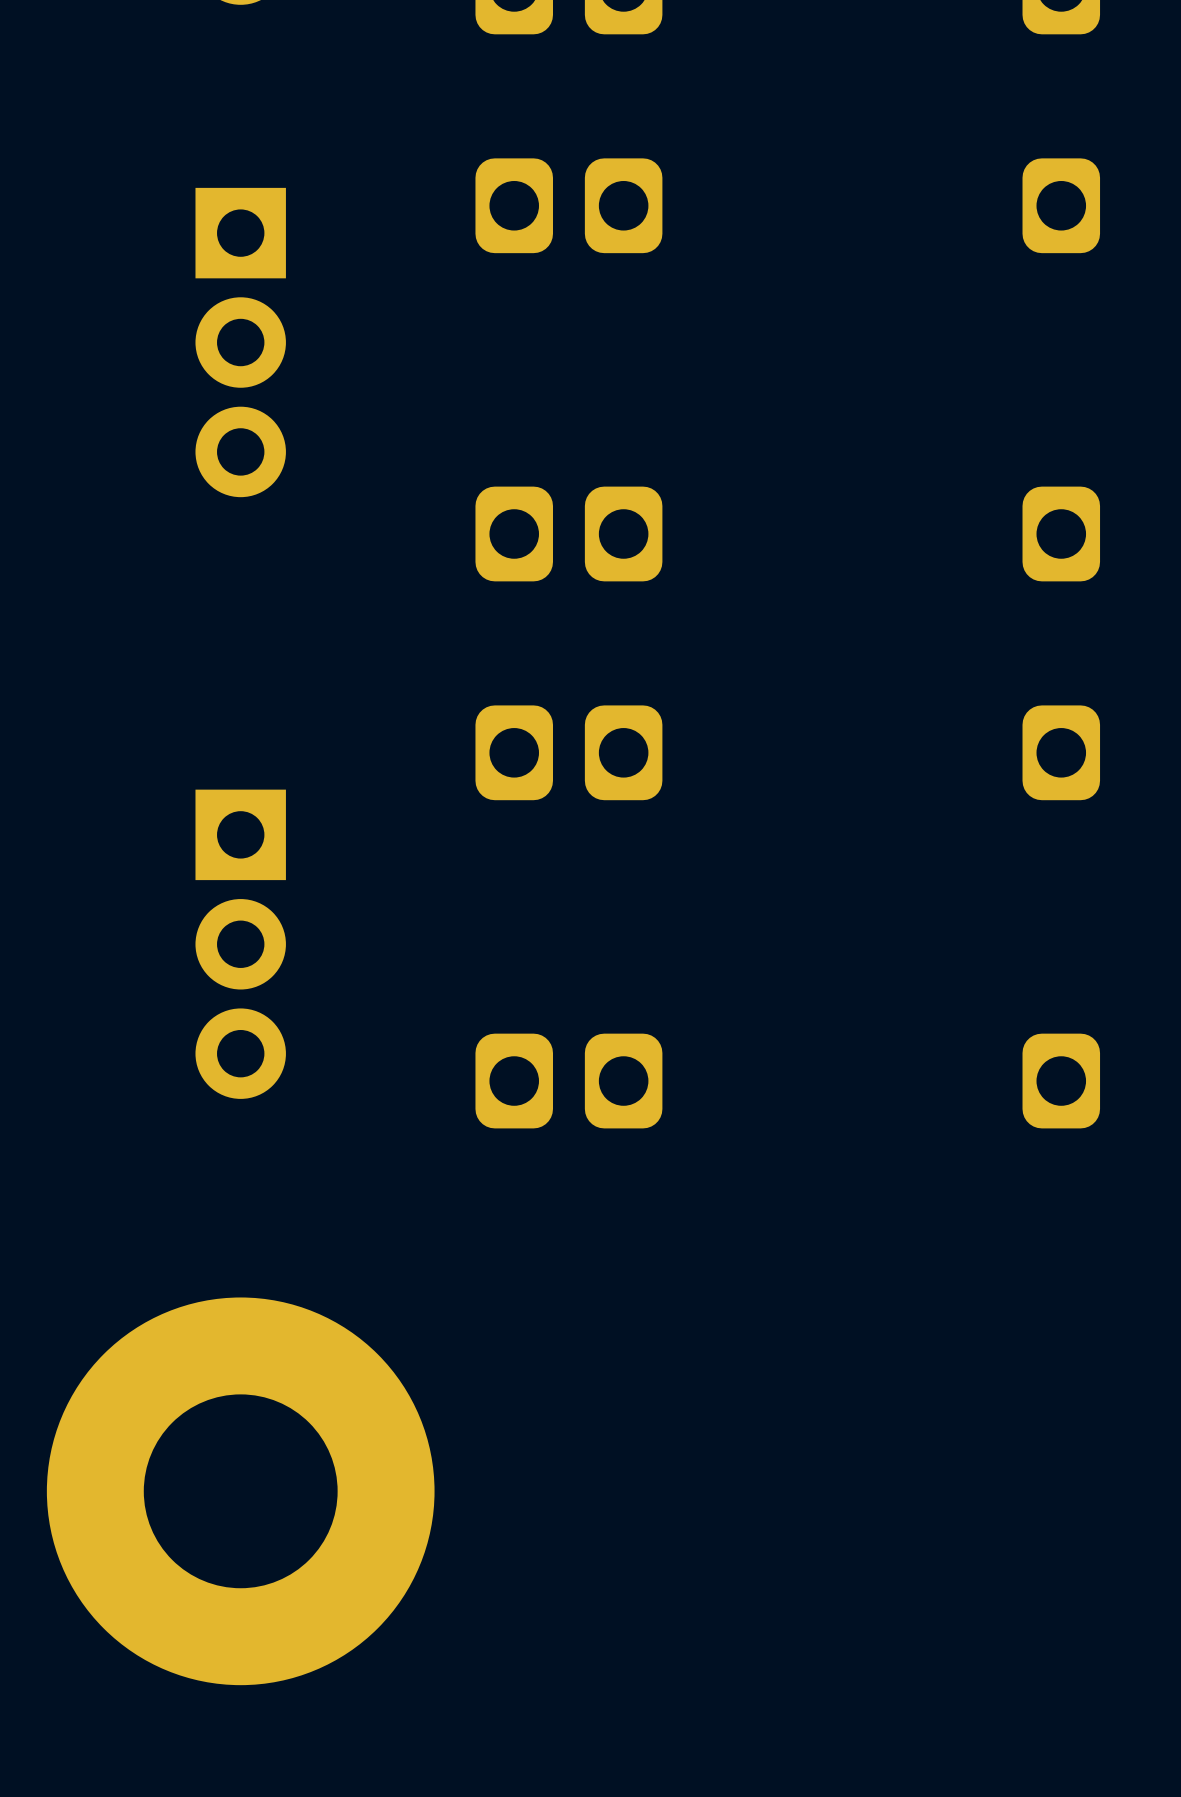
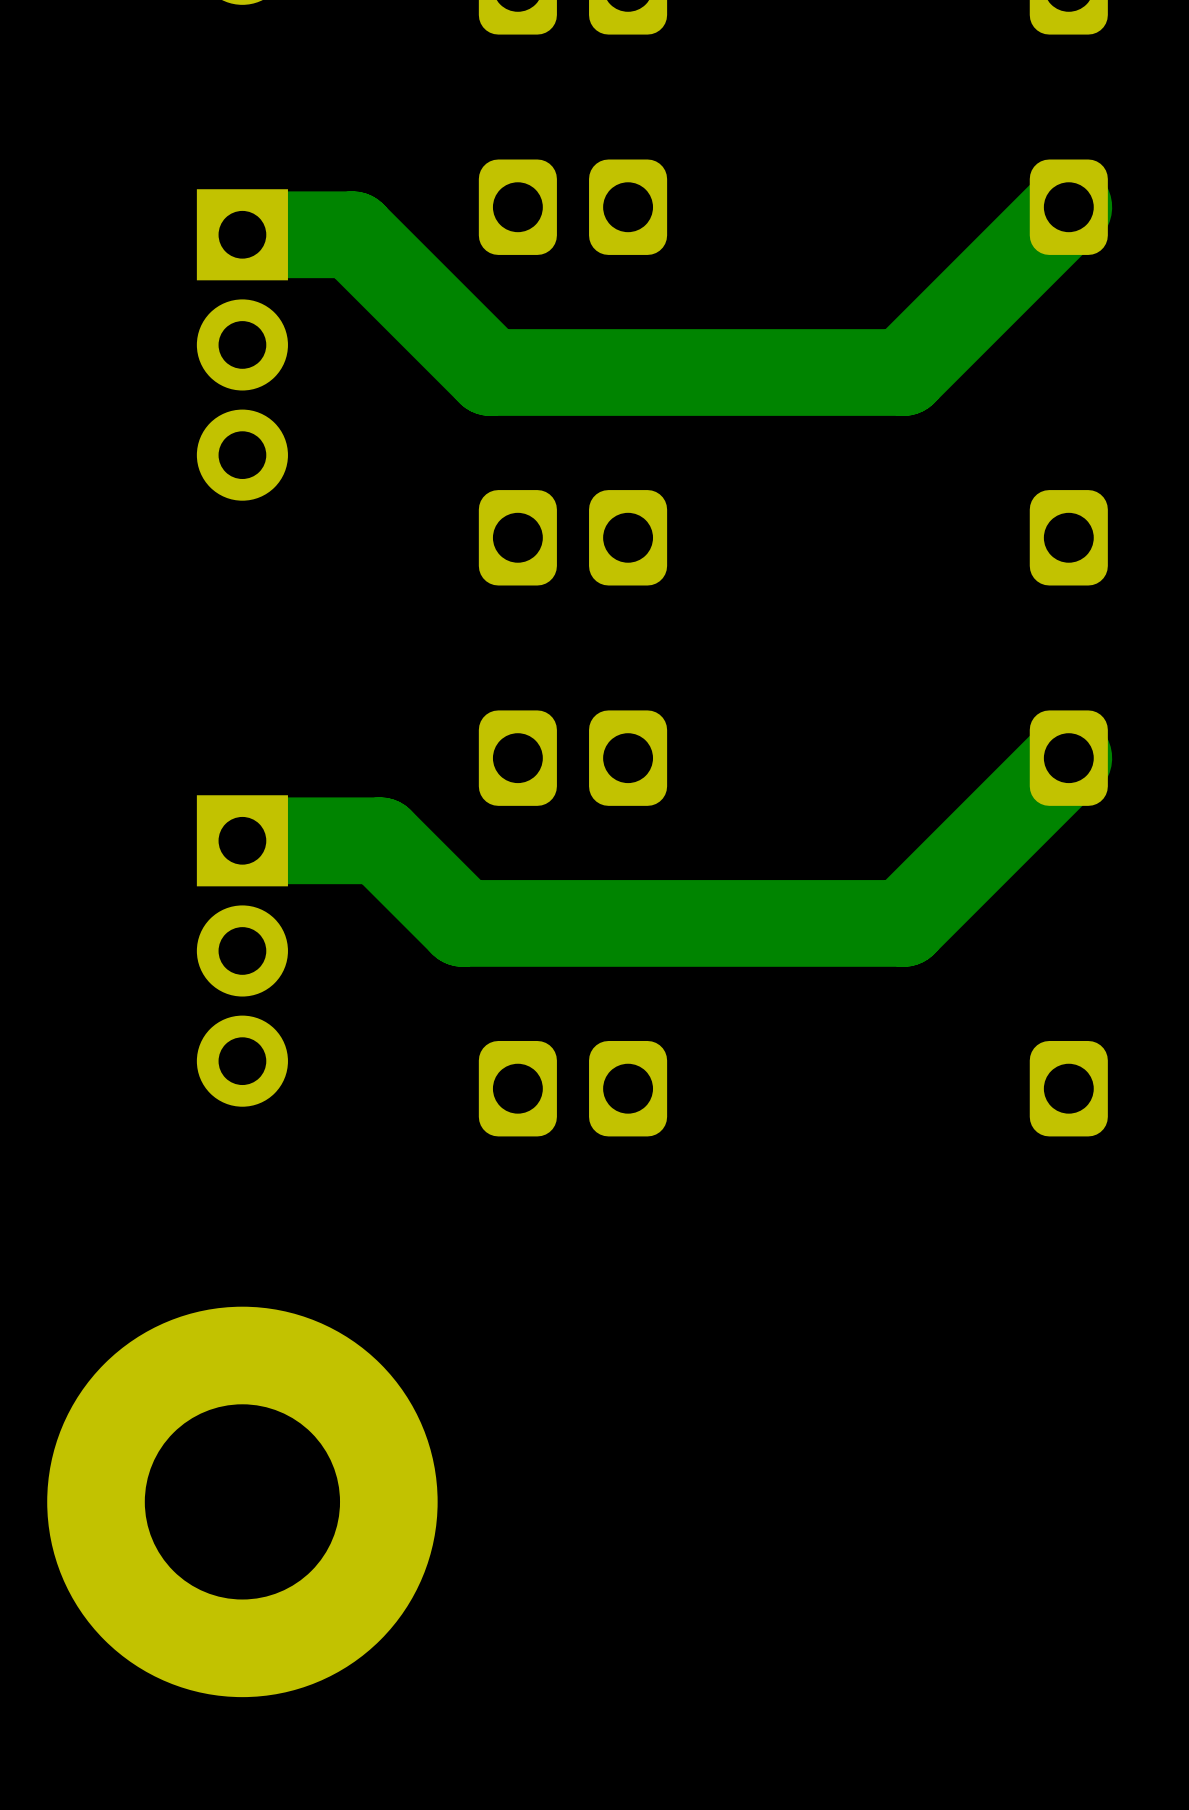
track: none -> (1068, 207) (903, 372) (490, 372) (352, 234) (242, 234)
track: none -> (1068, 758) (903, 923) (462, 923) (380, 840) (242, 840)

